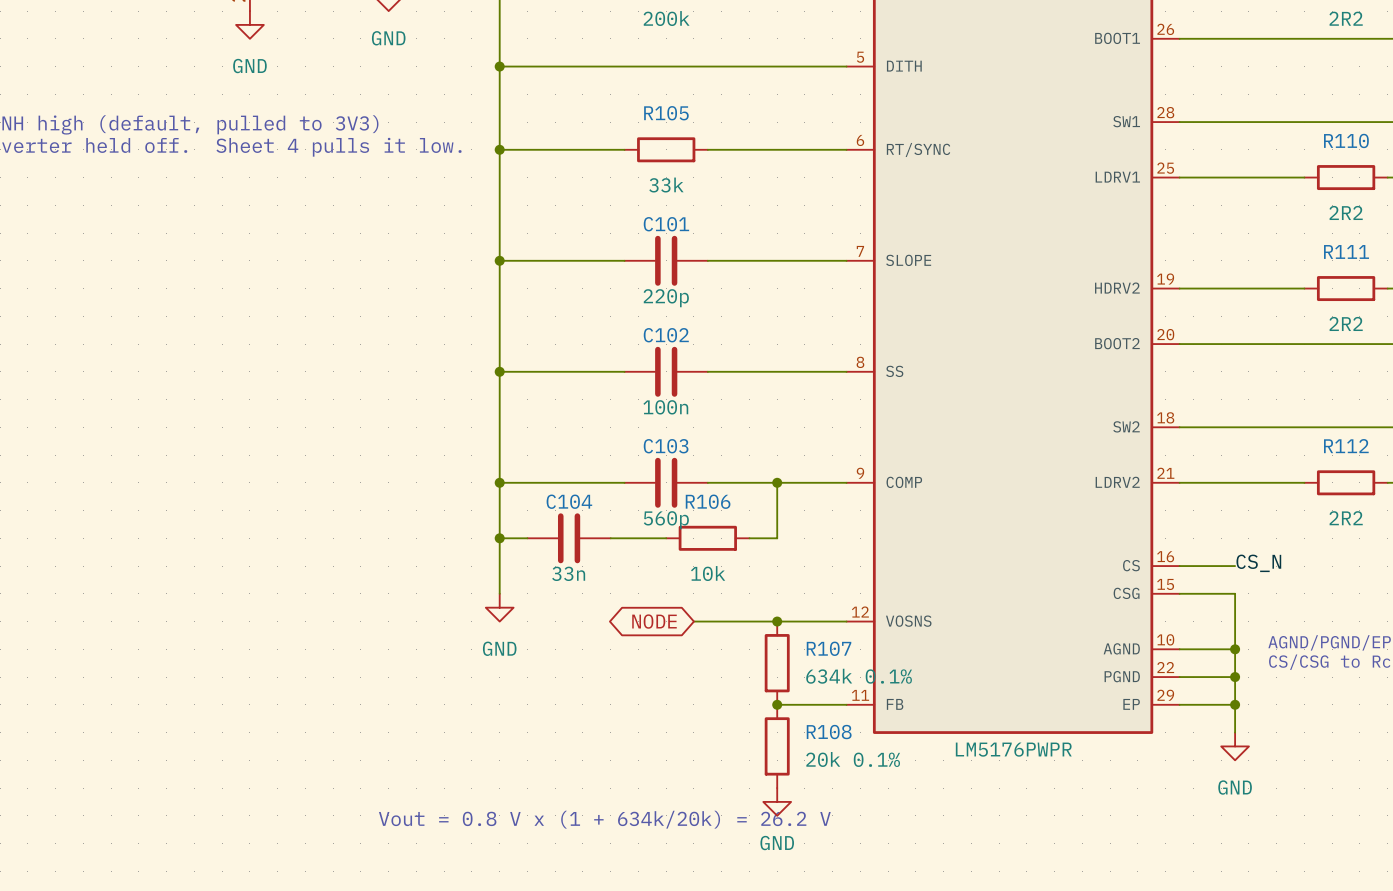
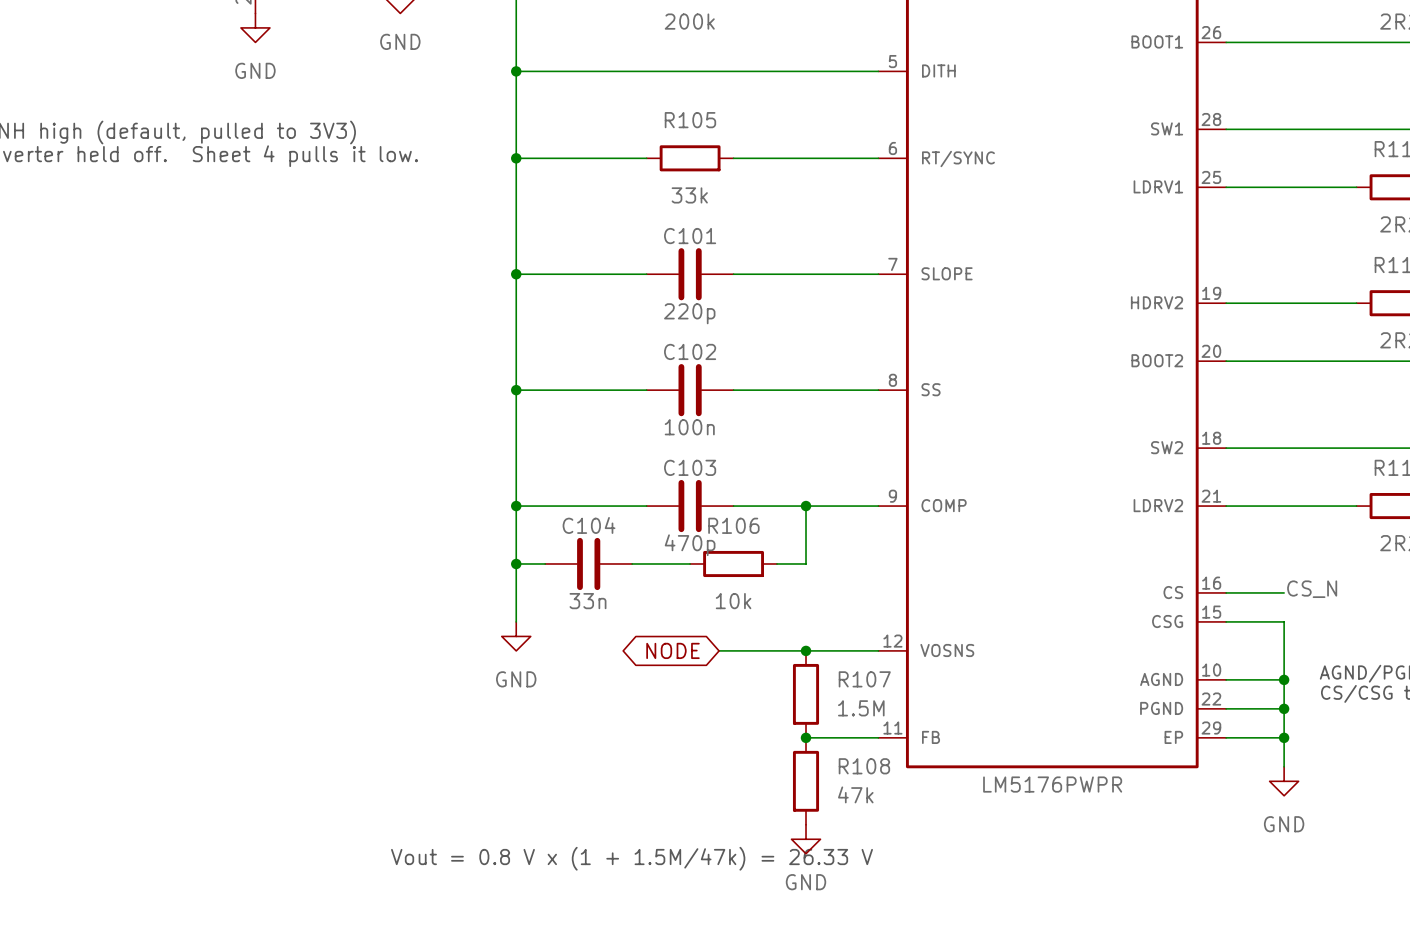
C103 value: 560p (666, 520) -> 470p (690, 545)
R107 value: 634k 0.1% (859, 676) -> 1.5M (861, 708)
R108 value: 20k 0.1% (853, 759) -> 47k (855, 794)
text: Vout = 0.8 V x (1 + 634k/20k) = 26.2 V (604, 819) -> Vout = 0.8 V x (1 + 1.5M/47k) = 26.33 V (631, 858)

